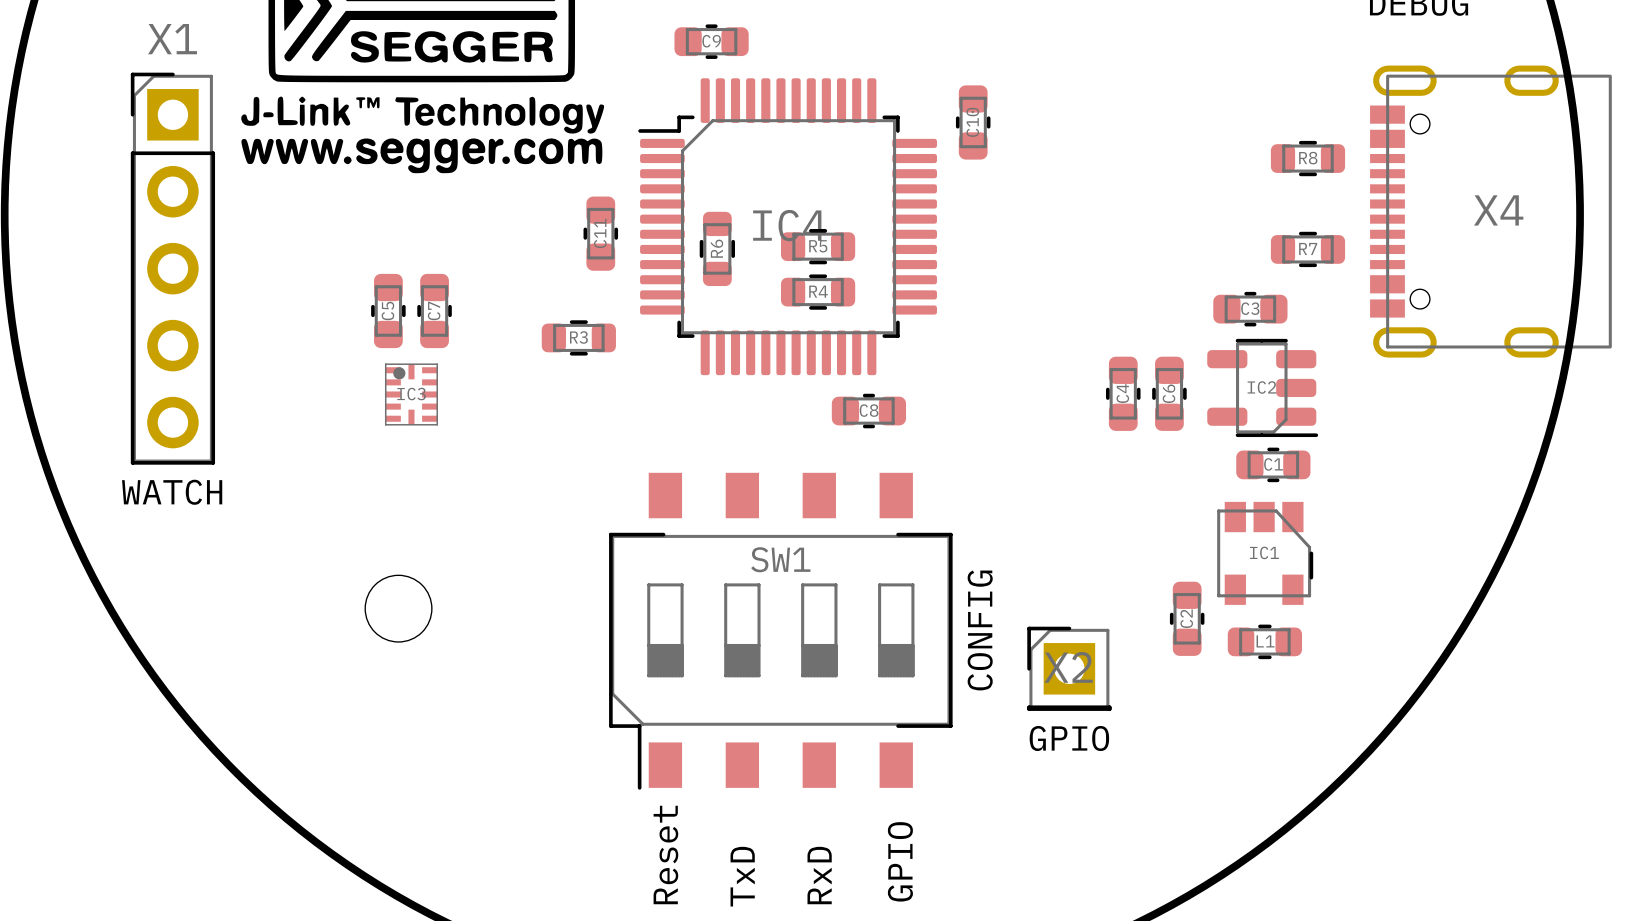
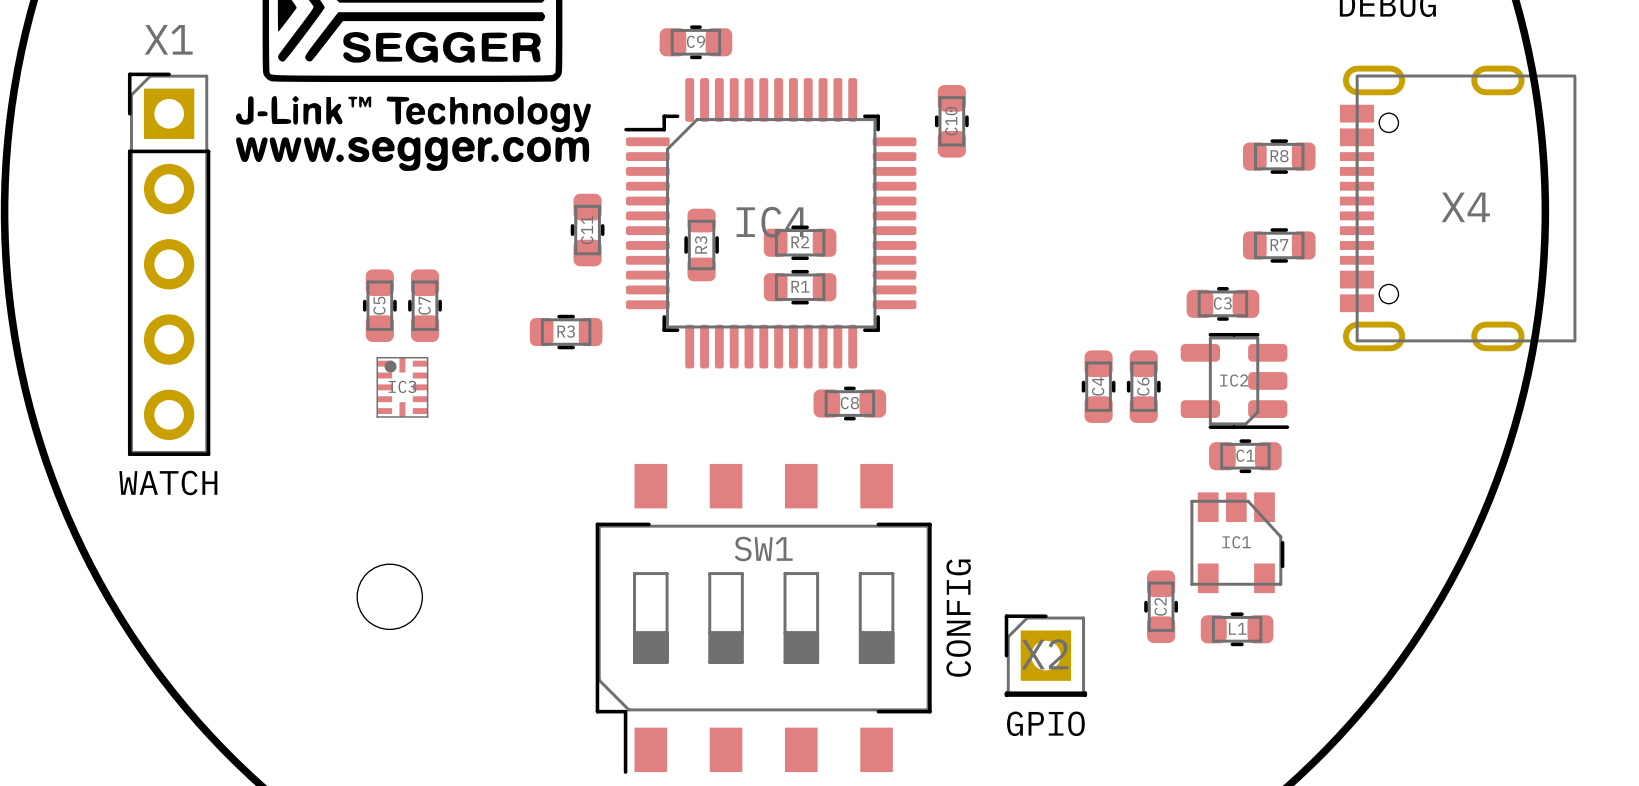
R5 name: R5 (818, 246) -> R2 (800, 242)
R6 name: R6 (717, 248) -> R3 (701, 244)
R4 name: R4 (818, 291) -> R1 (800, 286)

